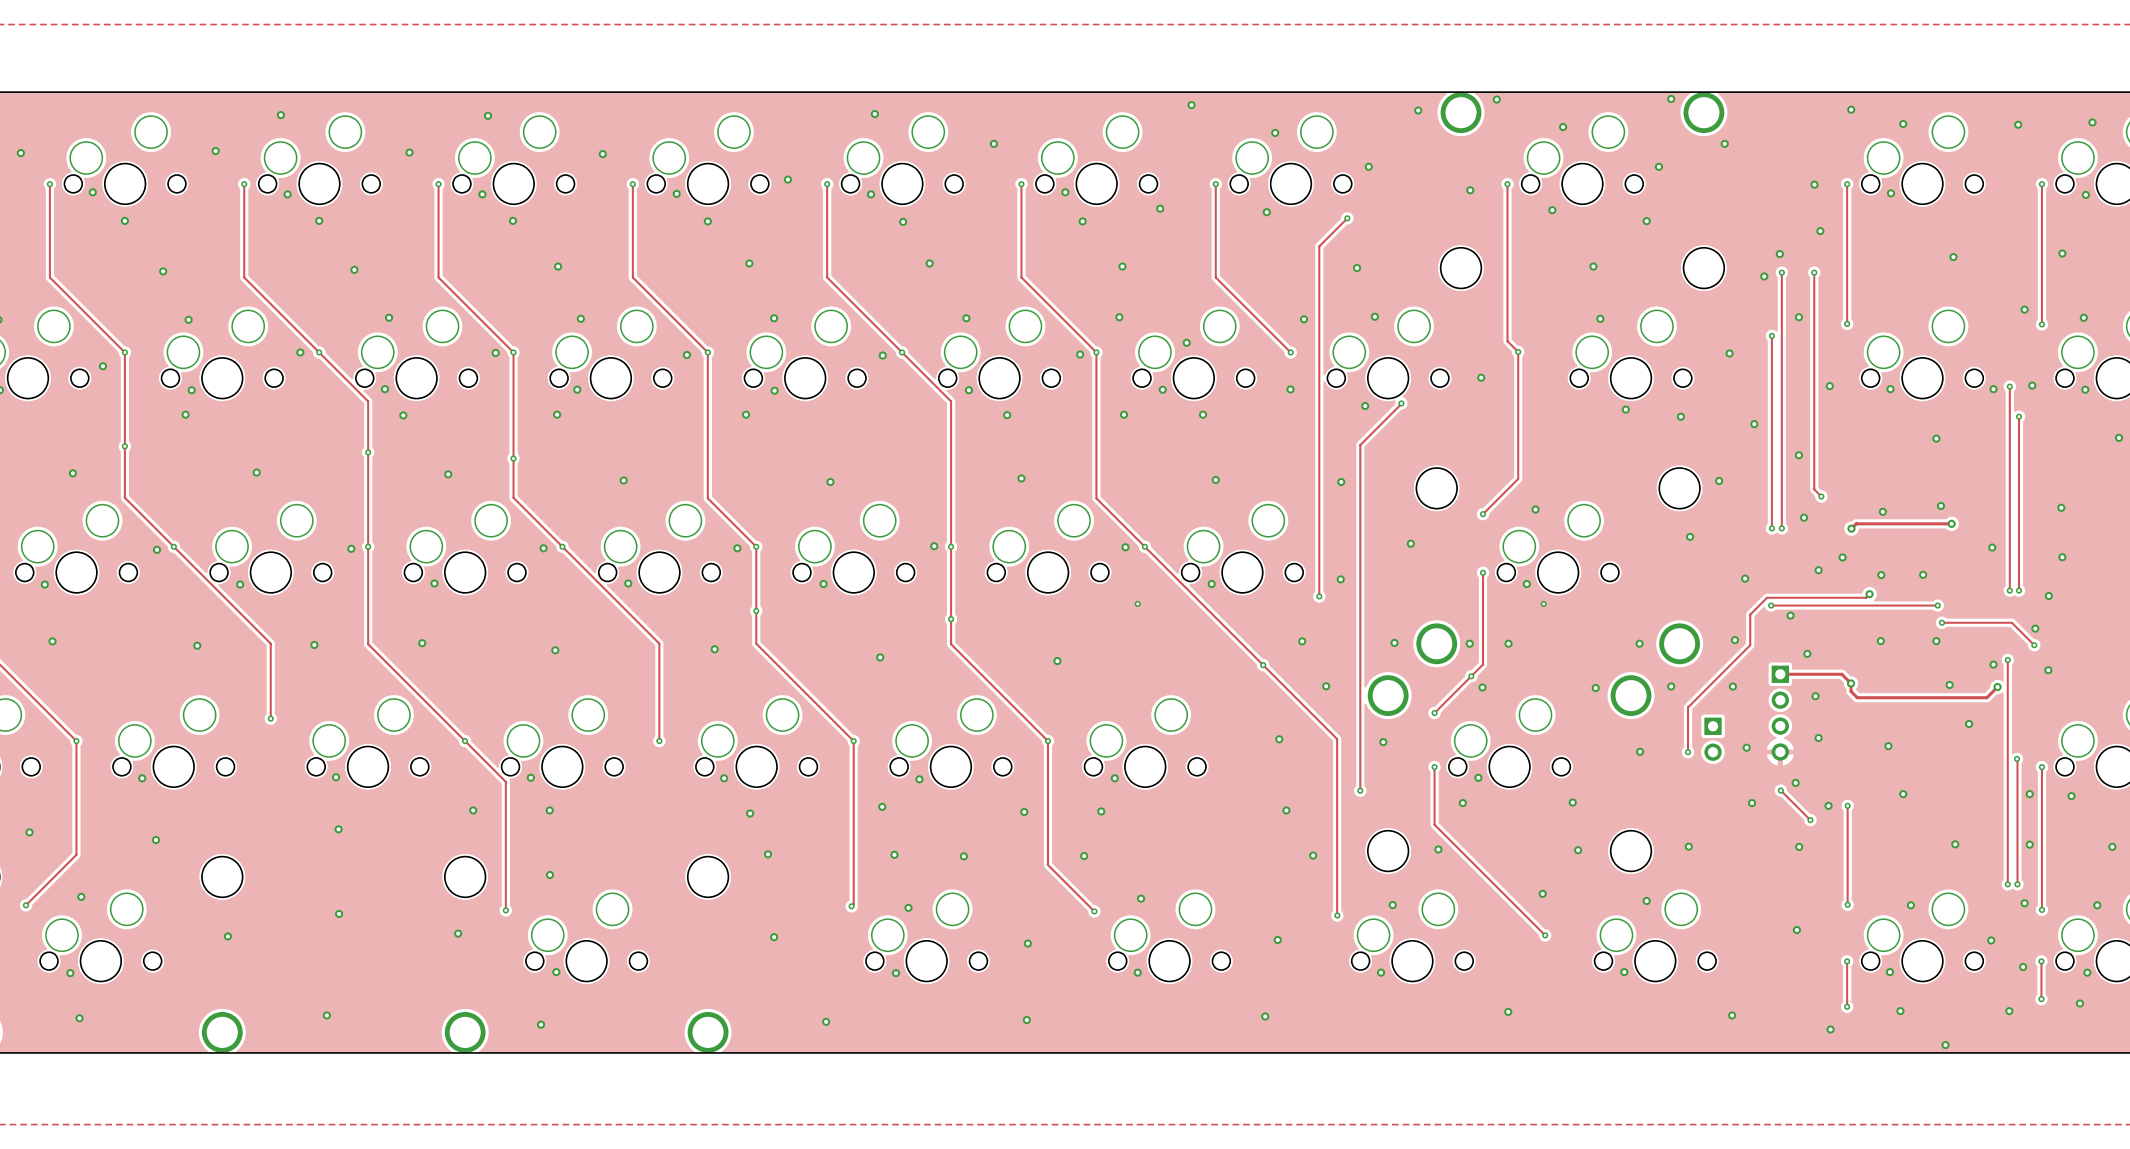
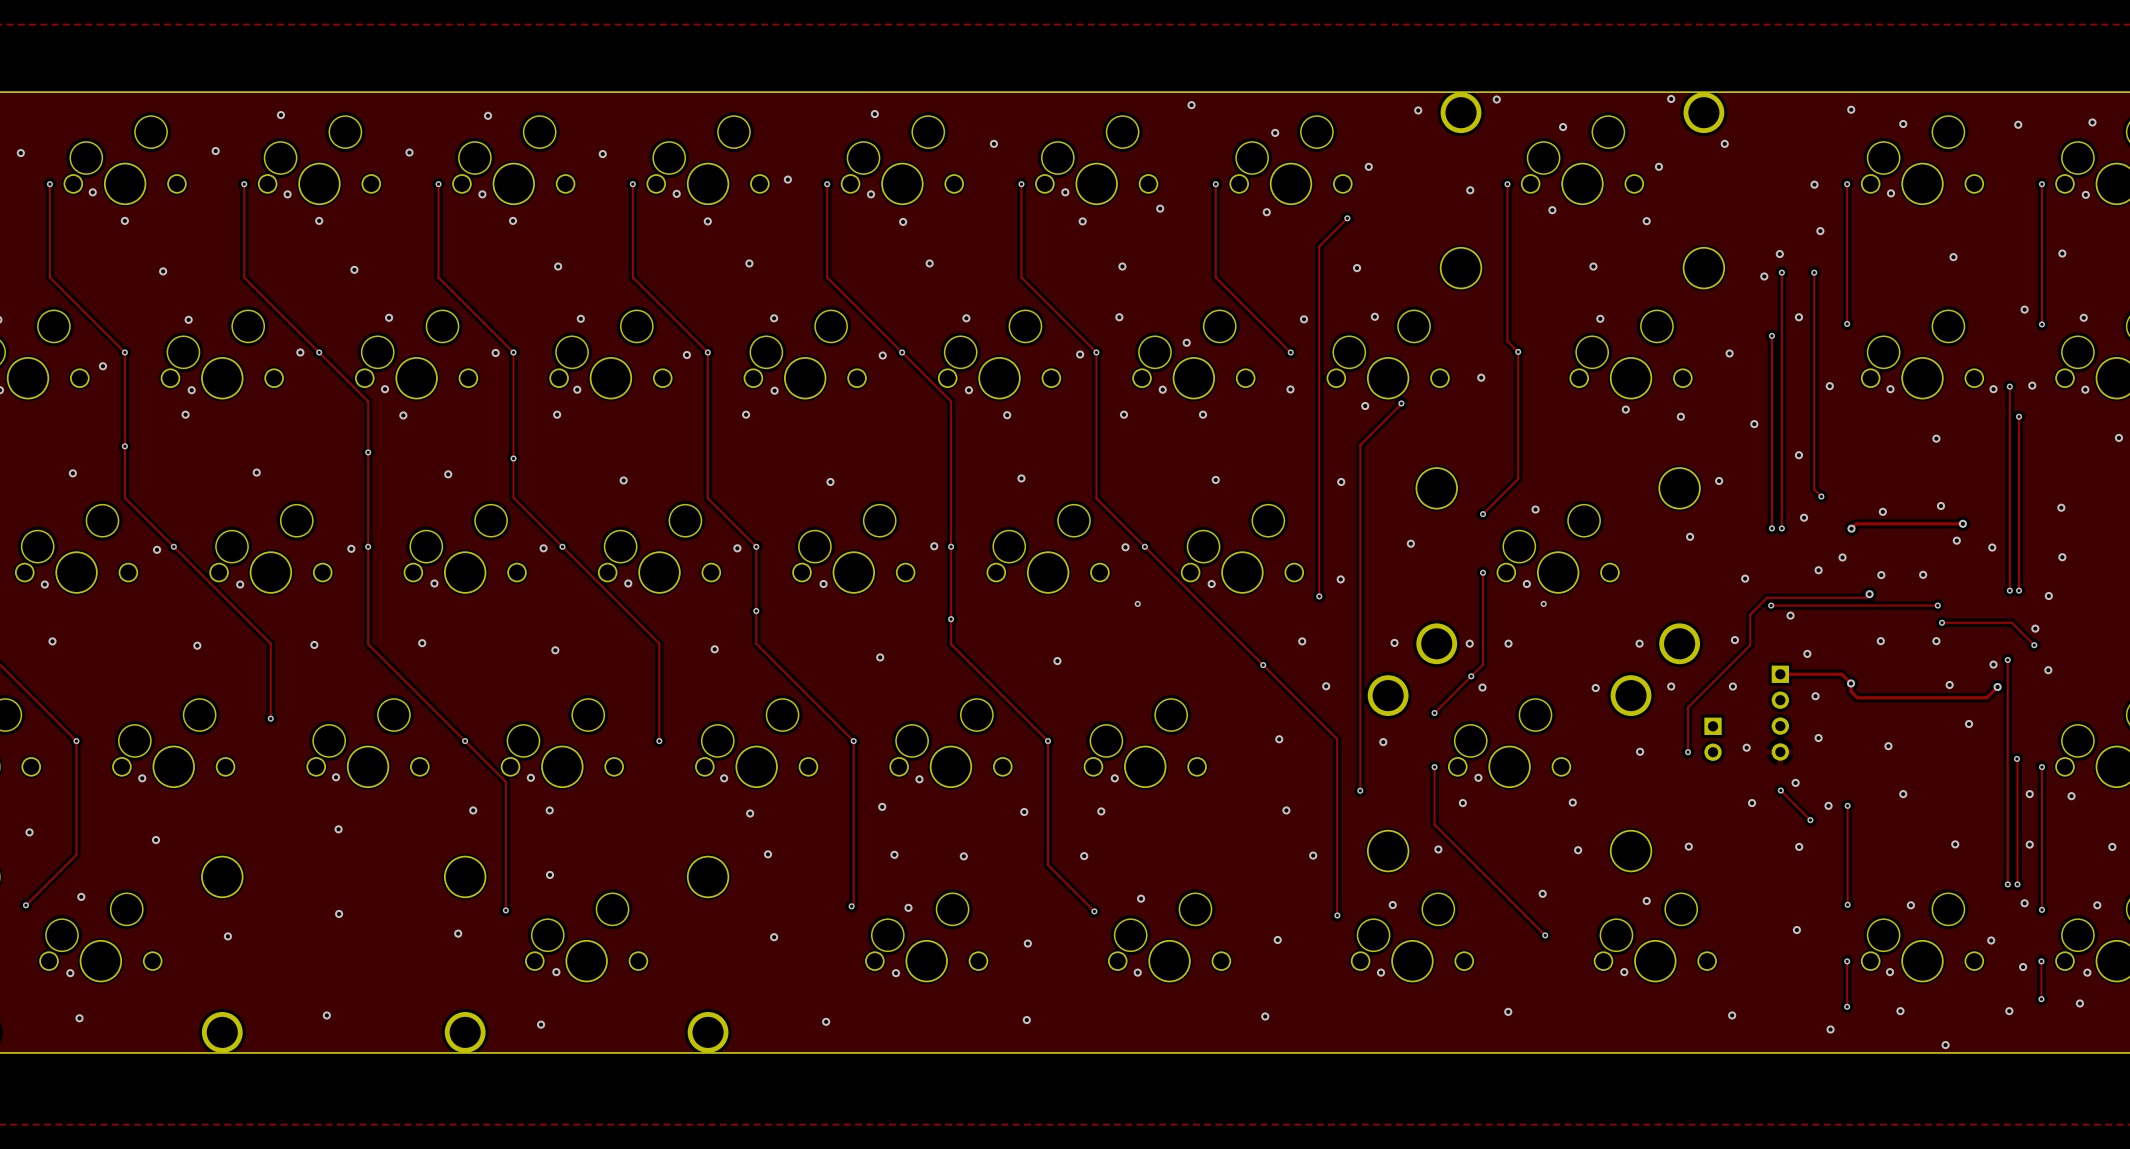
track: none -> (1951, 523) (1962, 523)
via: (1951, 523) -> none
via: none -> (1962, 523)
via: none -> (1956, 540)

